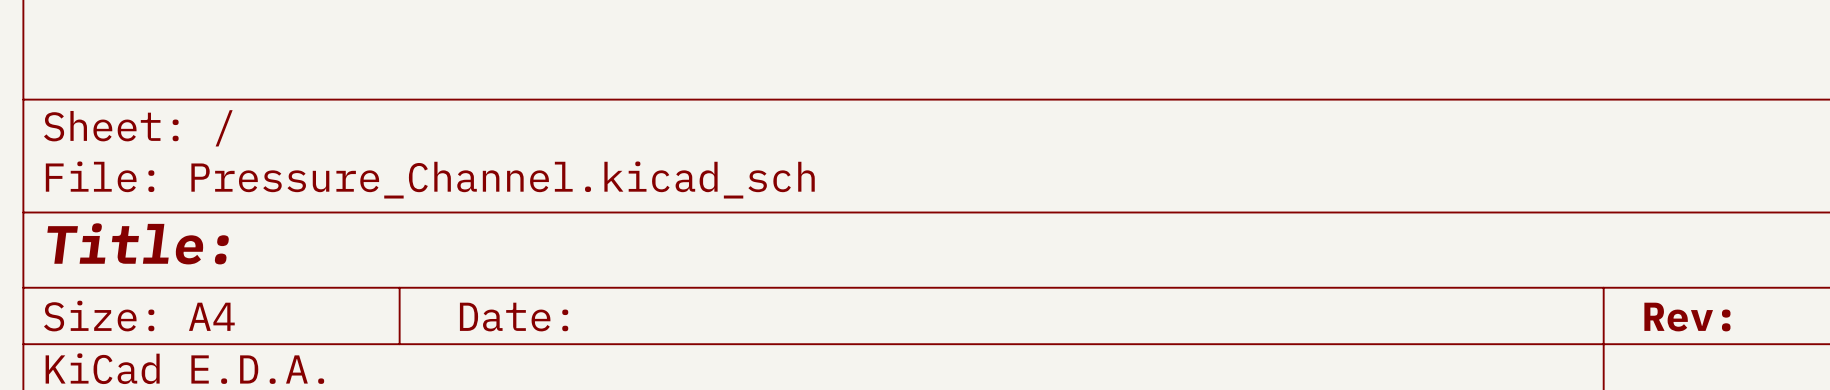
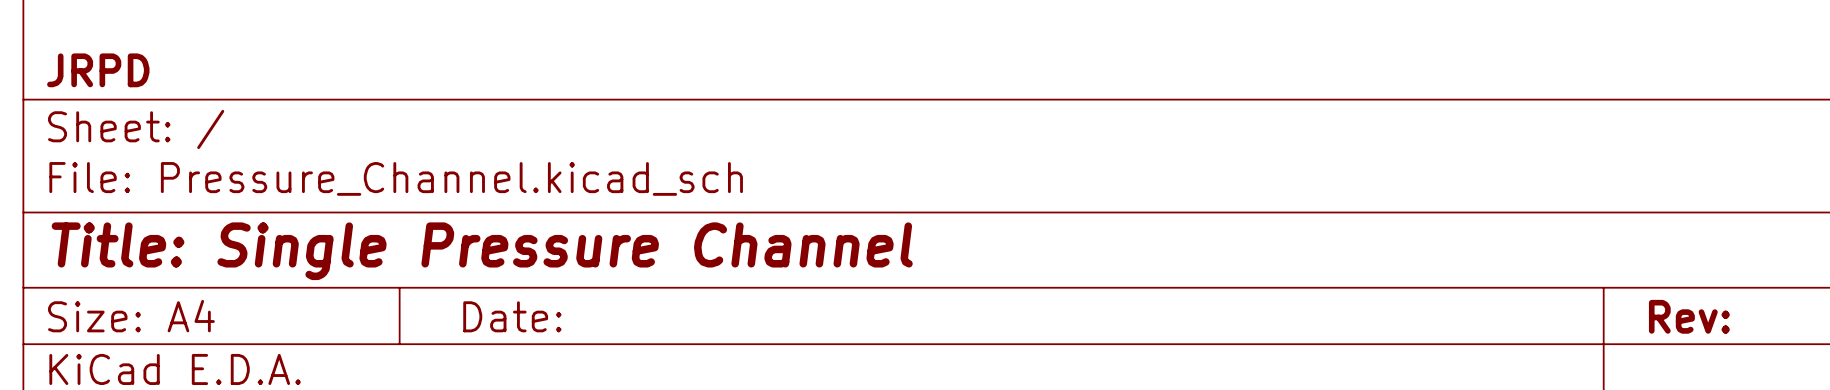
title block: none -> JRPD (98, 70)
title block: Title: (138, 243) -> Title: Single Pressure Channel (482, 251)

